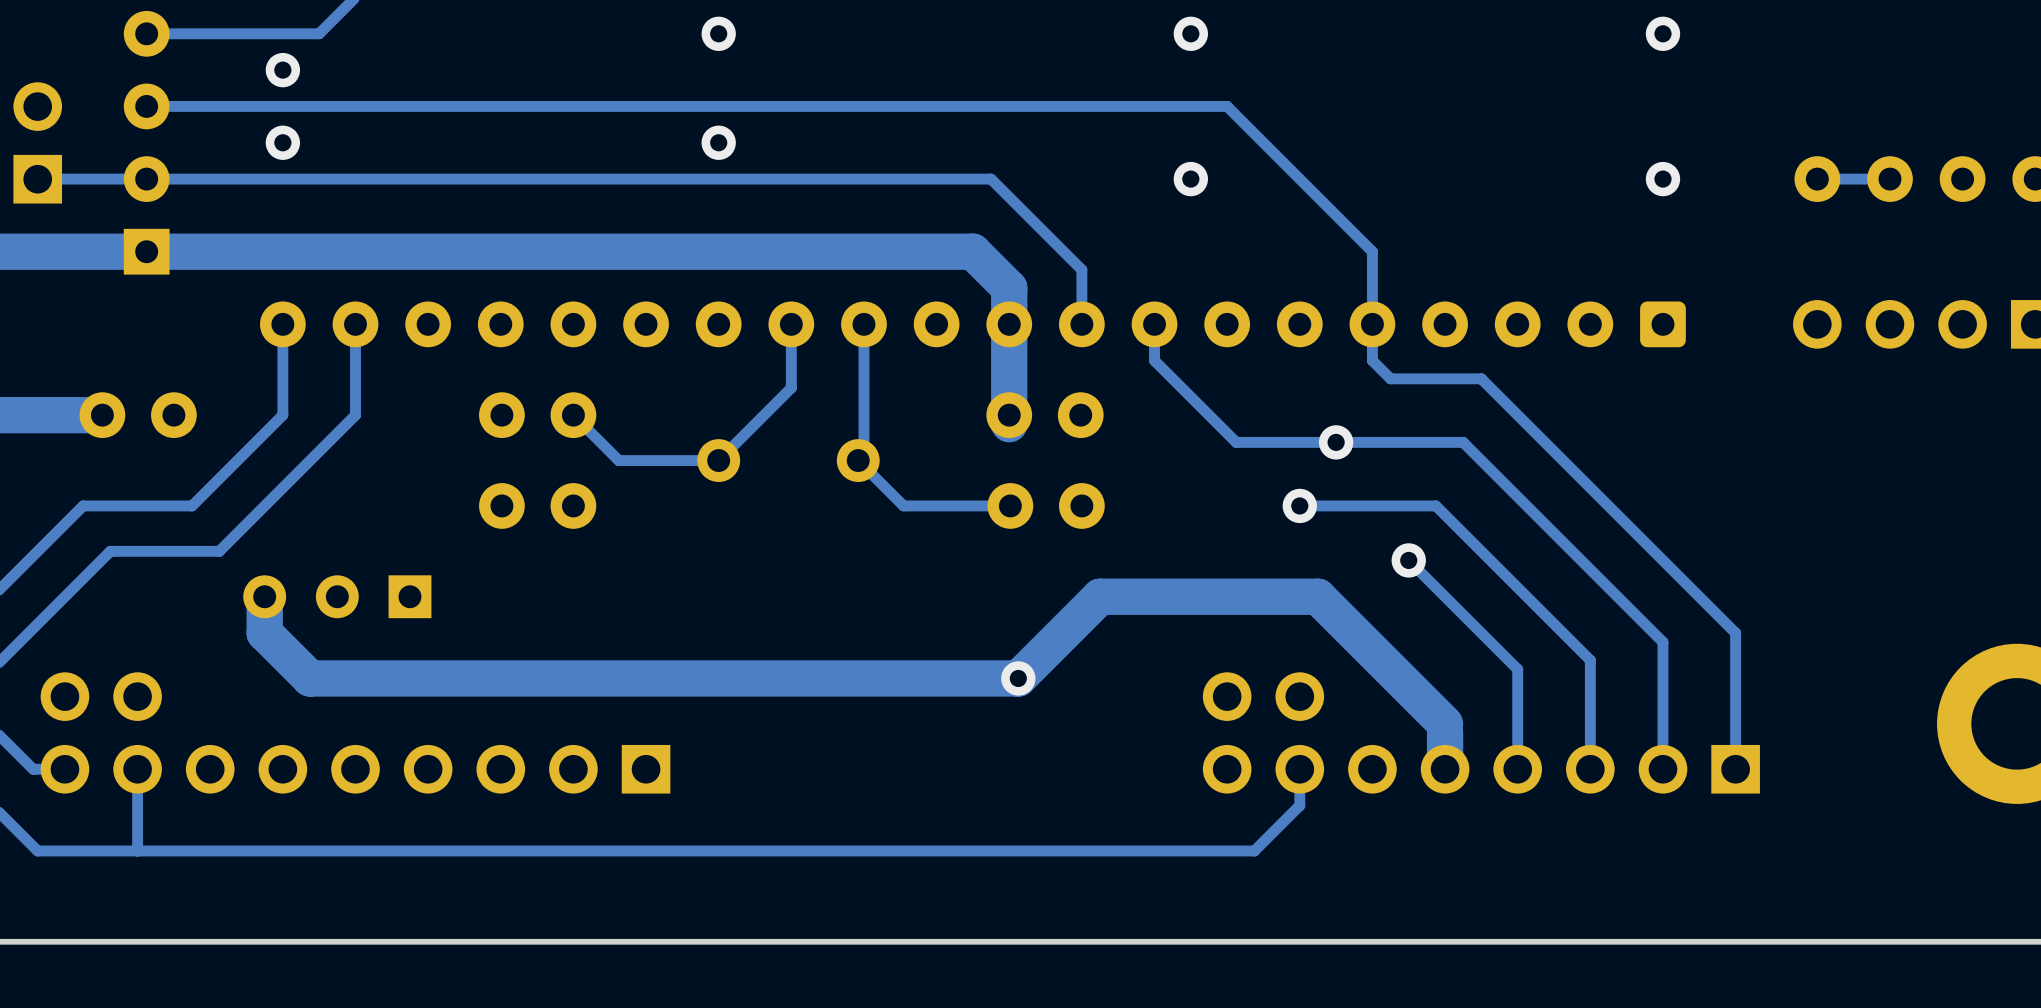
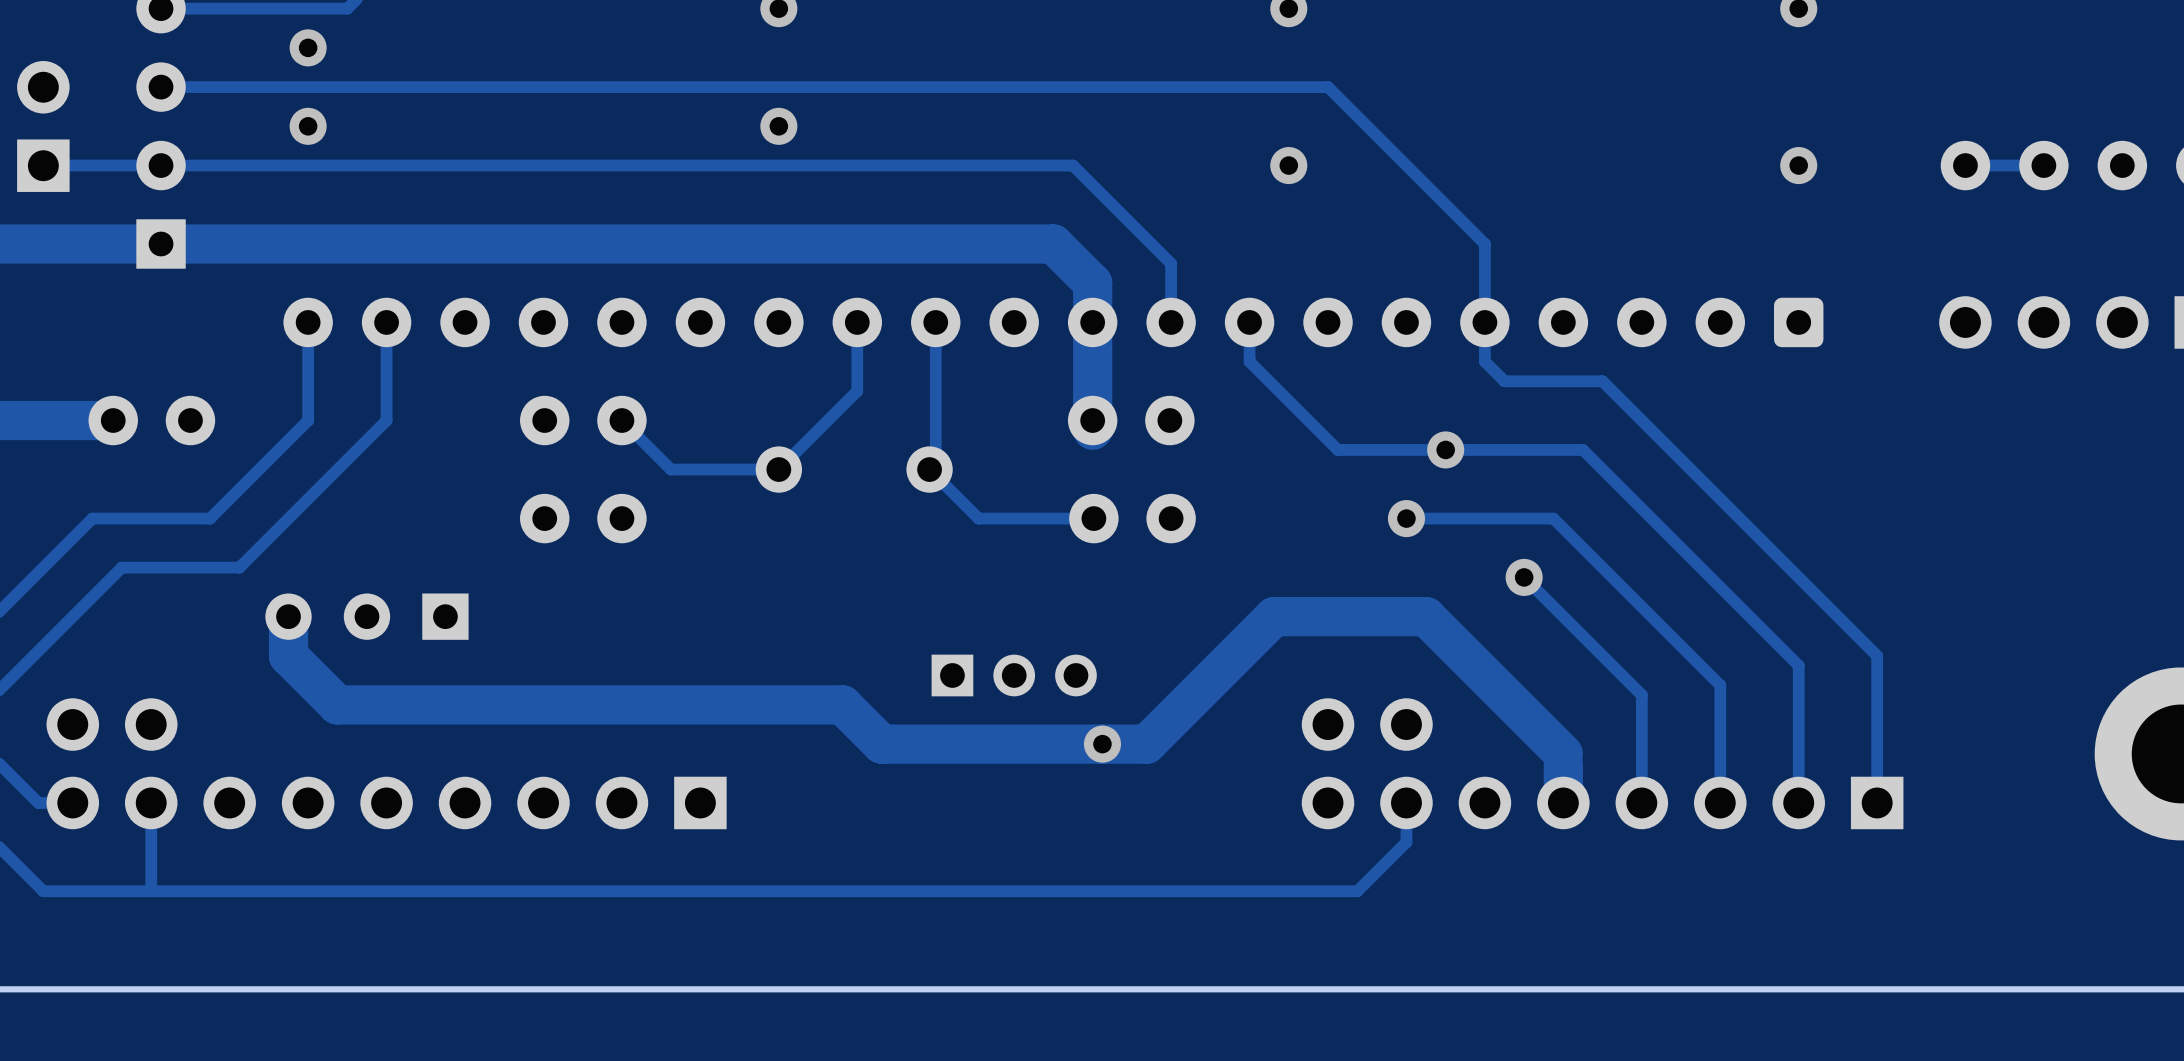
track: (1177, 596) (1100, 596) (1018, 678) (777, 678) -> (1274, 616) (1146, 744) (881, 744) (842, 704)
part: none -> (1014, 675)
via position: (1018, 678) -> (1102, 744)

